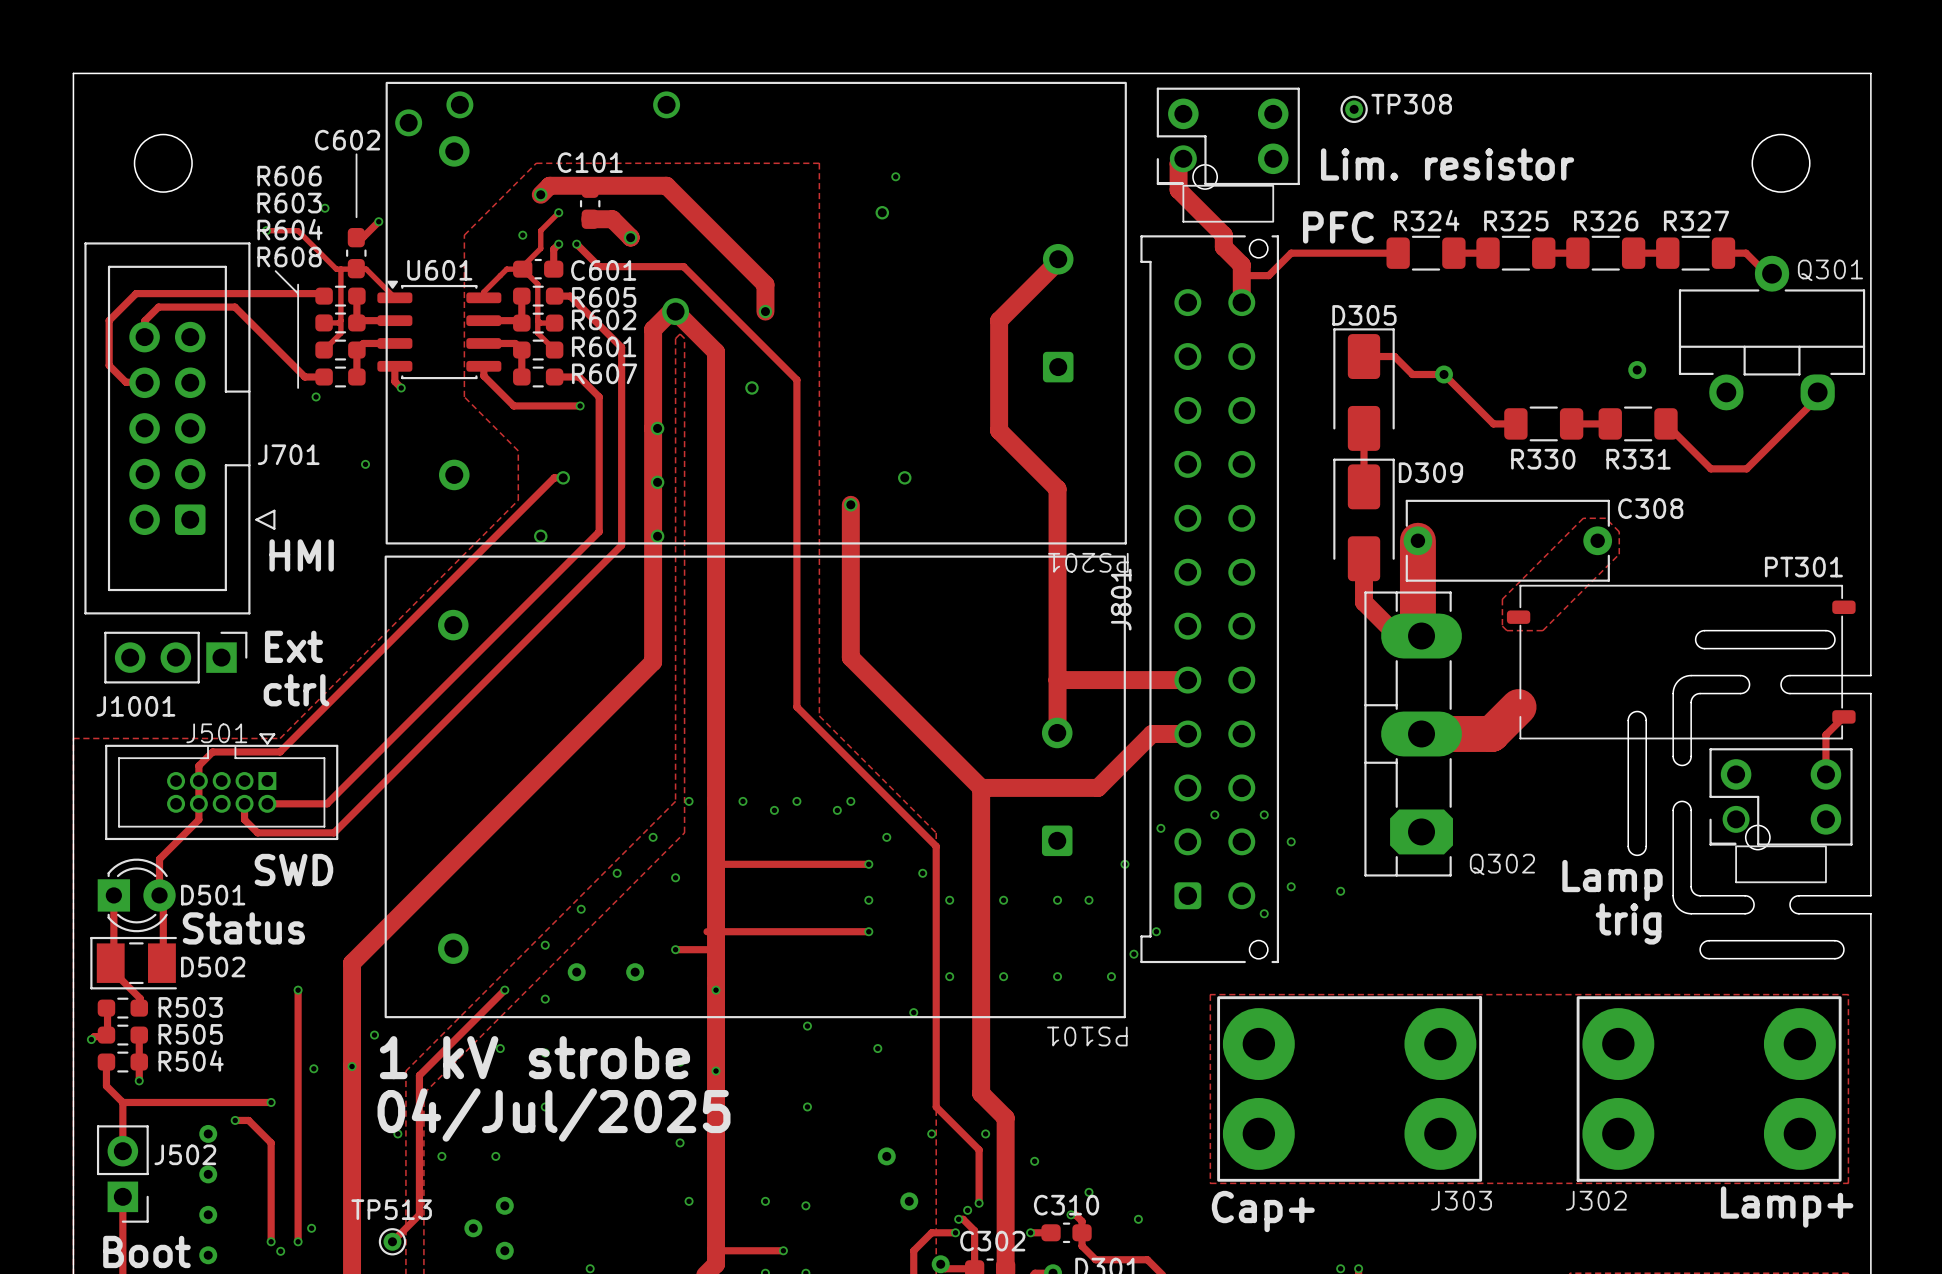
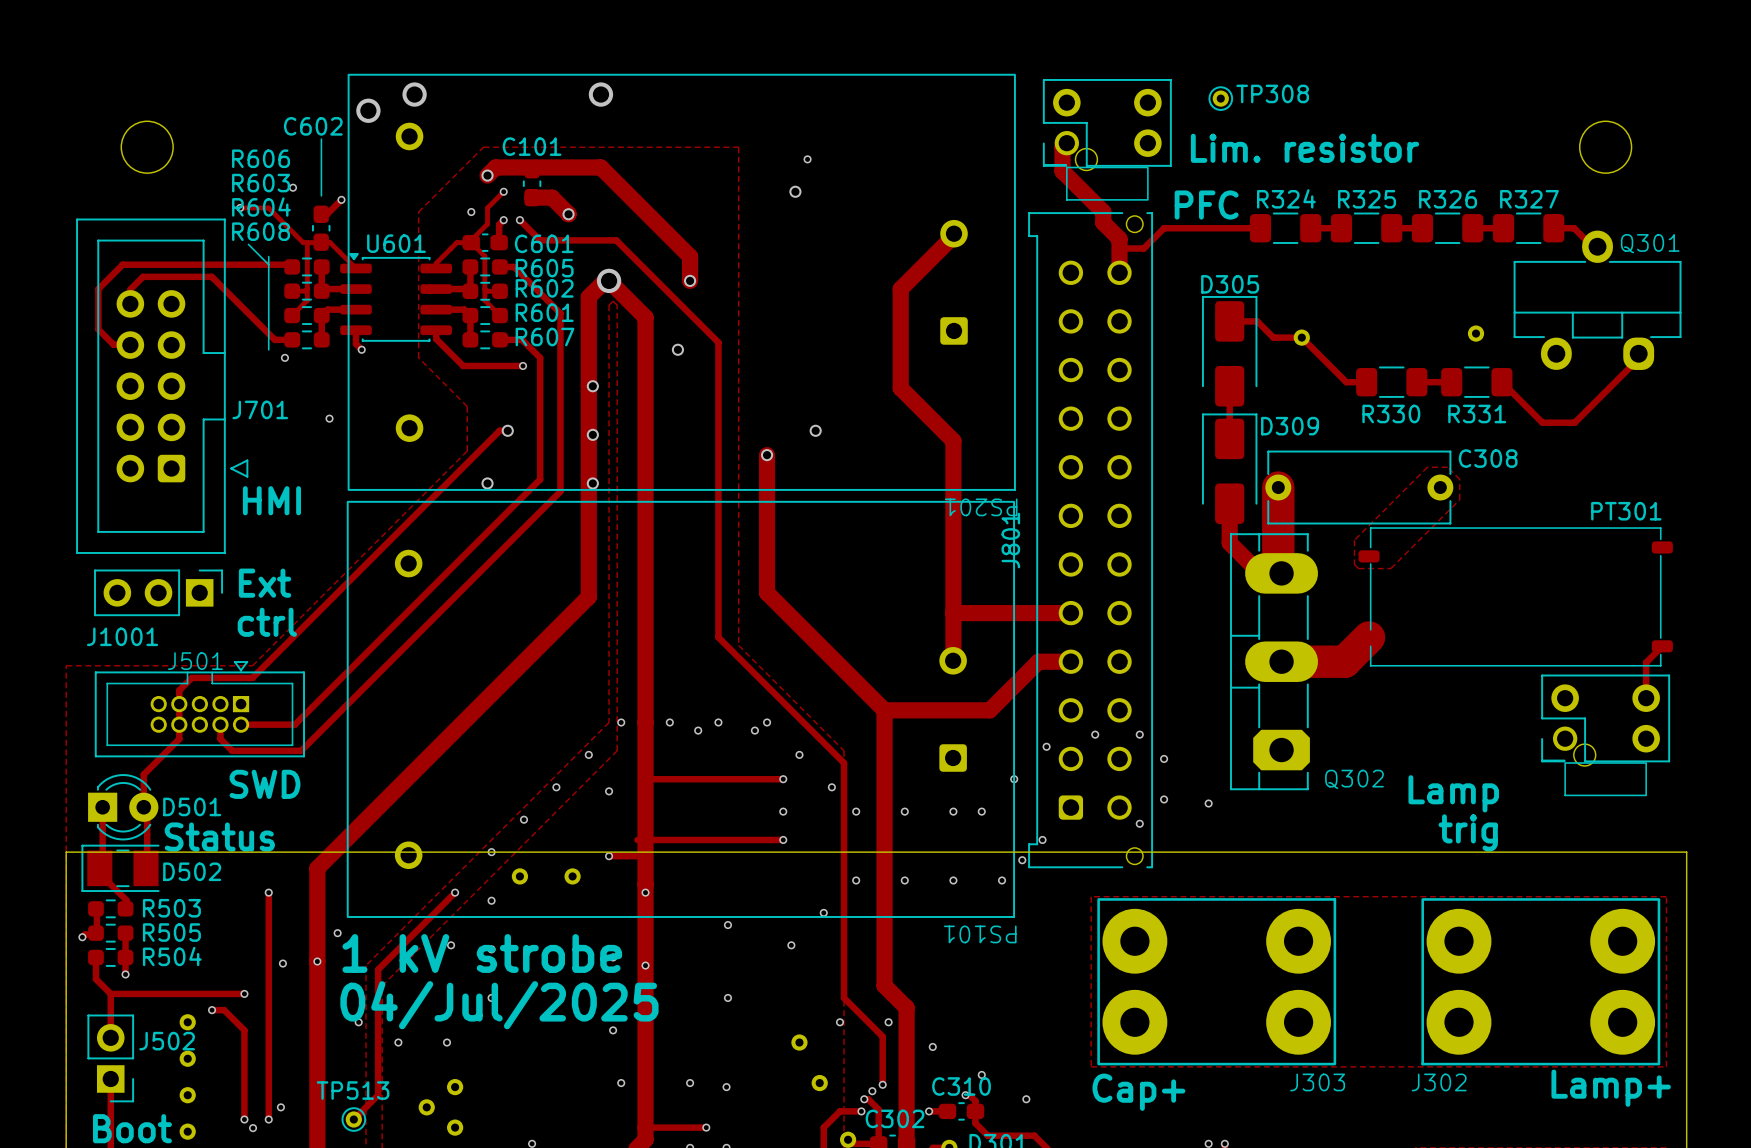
board edge: (1704, 630) (1827, 630) (1833, 634) (1834, 640) (1832, 645) (1825, 648) (1703, 648) (1697, 645) (1695, 638) (1698, 633) (1704, 630) -> none
board edge: (1691, 675) (1741, 675) (1747, 679) (1749, 685) (1742, 693) (1698, 693) (1693, 697) (1691, 702) (1691, 757) (1687, 763) (1680, 765) (1675, 762) (1673, 757) (1673, 691) (1678, 680) (1691, 675) -> none
board edge: (1628, 720) (1628, 847) (1631, 853) (1638, 855) (1644, 851) (1646, 846) (1646, 719) (1643, 714) (1637, 711) (1630, 714) (1628, 720) -> none
board edge: (1673, 810) (1673, 895) (1677, 906) (1689, 913) (1745, 913) (1750, 911) (1753, 903) (1748, 896) (1698, 895) (1693, 892) (1691, 886) (1690, 808) (1687, 803) (1680, 801) (1675, 804) (1673, 810) -> none
board edge: (1709, 940) (1836, 940) (1842, 944) (1843, 950) (1840, 956) (1834, 958) (1707, 958) (1701, 955) (1700, 948) (1703, 942) (1709, 940) -> none
board edge: (73, 945) (73, 73) (1870, 73) (1870, 675) (1788, 675) (1782, 679) (1781, 684) (1782, 690) (1788, 693) (1870, 693) (1870, 895) (1797, 895) (1791, 899) (1790, 904) (1791, 910) (1797, 913) (1870, 913) (1870, 945) -> (66, 852) (1686, 852)

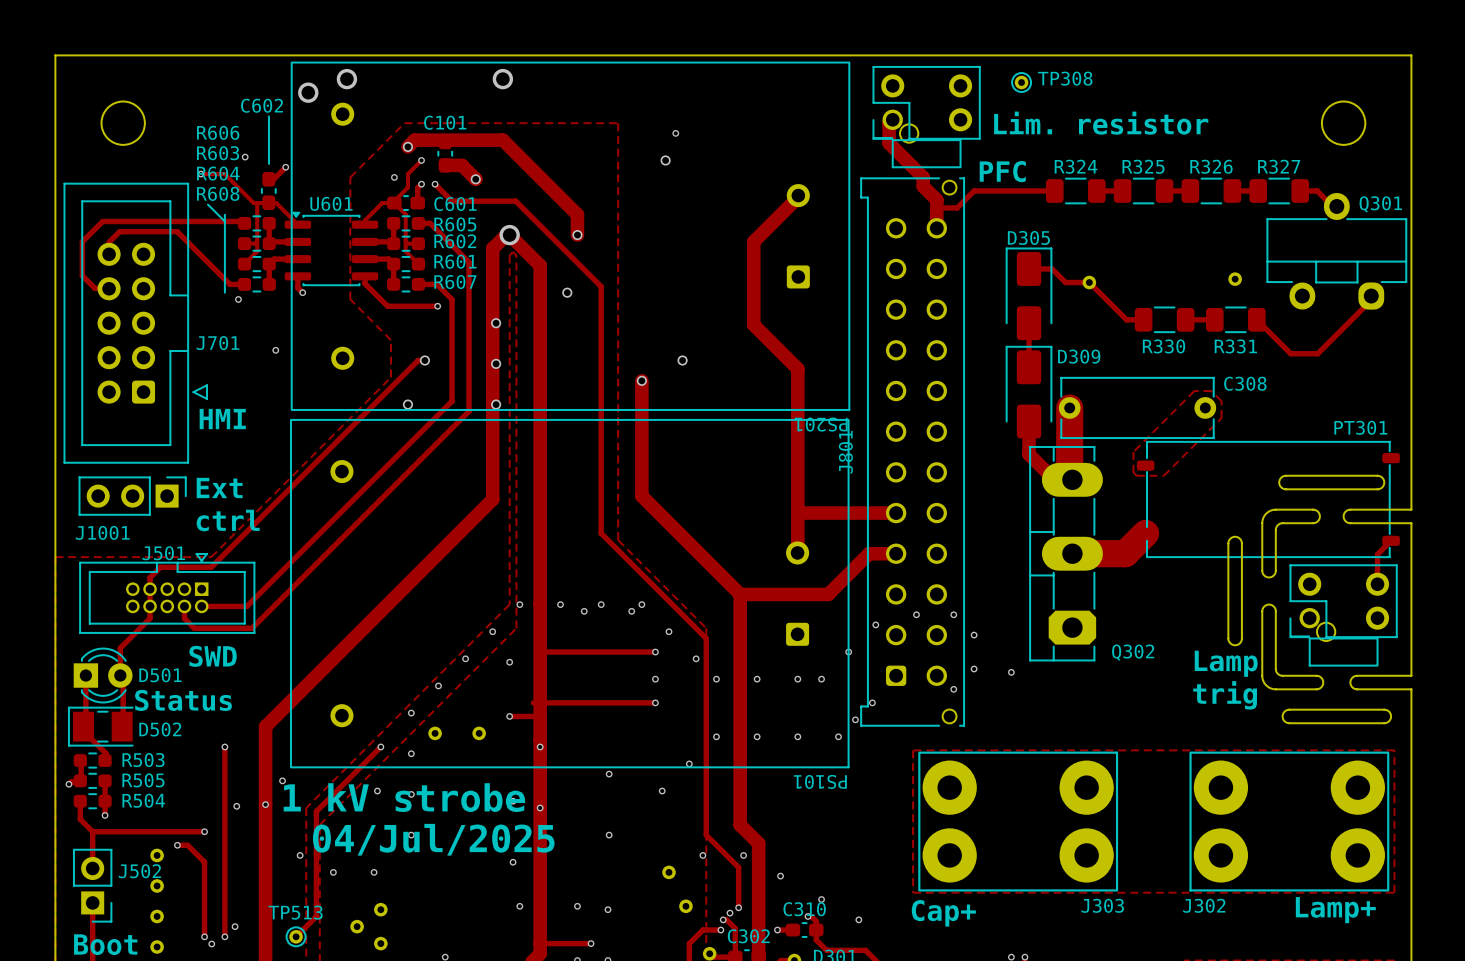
board edge: none -> (1285, 475) (1378, 475) (1382, 478) (1384, 483) (1382, 487) (1377, 489) (1285, 489) (1281, 487) (1279, 482) (1281, 477) (1285, 475)
board edge: none -> (1275, 509) (1314, 509) (1318, 512) (1319, 517) (1314, 522) (1281, 523) (1277, 525) (1275, 571) (1273, 576) (1268, 577) (1262, 571) (1262, 521) (1266, 513) (1275, 509)
board edge: none -> (1228, 543) (1228, 639) (1231, 643) (1236, 645) (1239, 643) (1241, 638) (1241, 542) (1239, 538) (1235, 536) (1230, 538) (1228, 543)
board edge: none -> (1262, 611) (1262, 675) (1265, 684) (1274, 689) (1320, 687) (1323, 681) (1319, 676) (1281, 675) (1277, 673) (1275, 609) (1273, 605) (1268, 604) (1264, 606) (1262, 611)
board edge: none -> (1289, 709) (1385, 709) (1389, 712) (1391, 717) (1389, 721) (1384, 723) (1288, 723) (1284, 721) (1282, 716) (1284, 711) (1289, 709)
board edge: (66, 852) (1686, 852) -> (55, 713) (55, 55) (1411, 55) (1411, 509) (1349, 509) (1345, 511) (1343, 516) (1345, 521) (1349, 523) (1411, 523) (1411, 675) (1356, 675) (1352, 677) (1350, 682) (1352, 687) (1356, 689) (1411, 689) (1411, 713)

